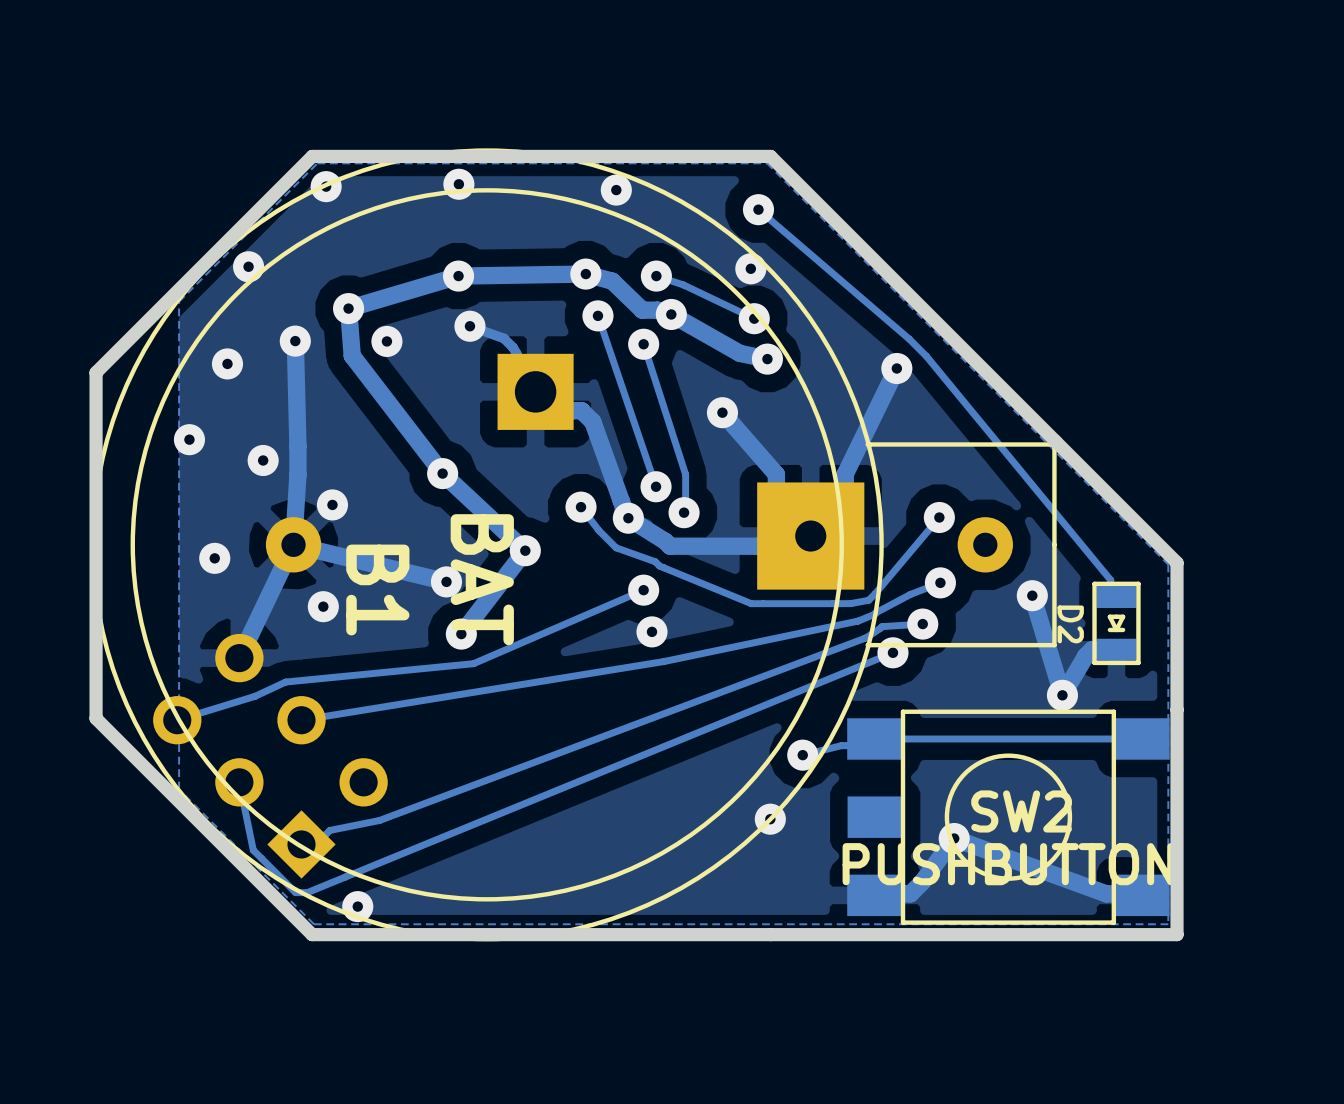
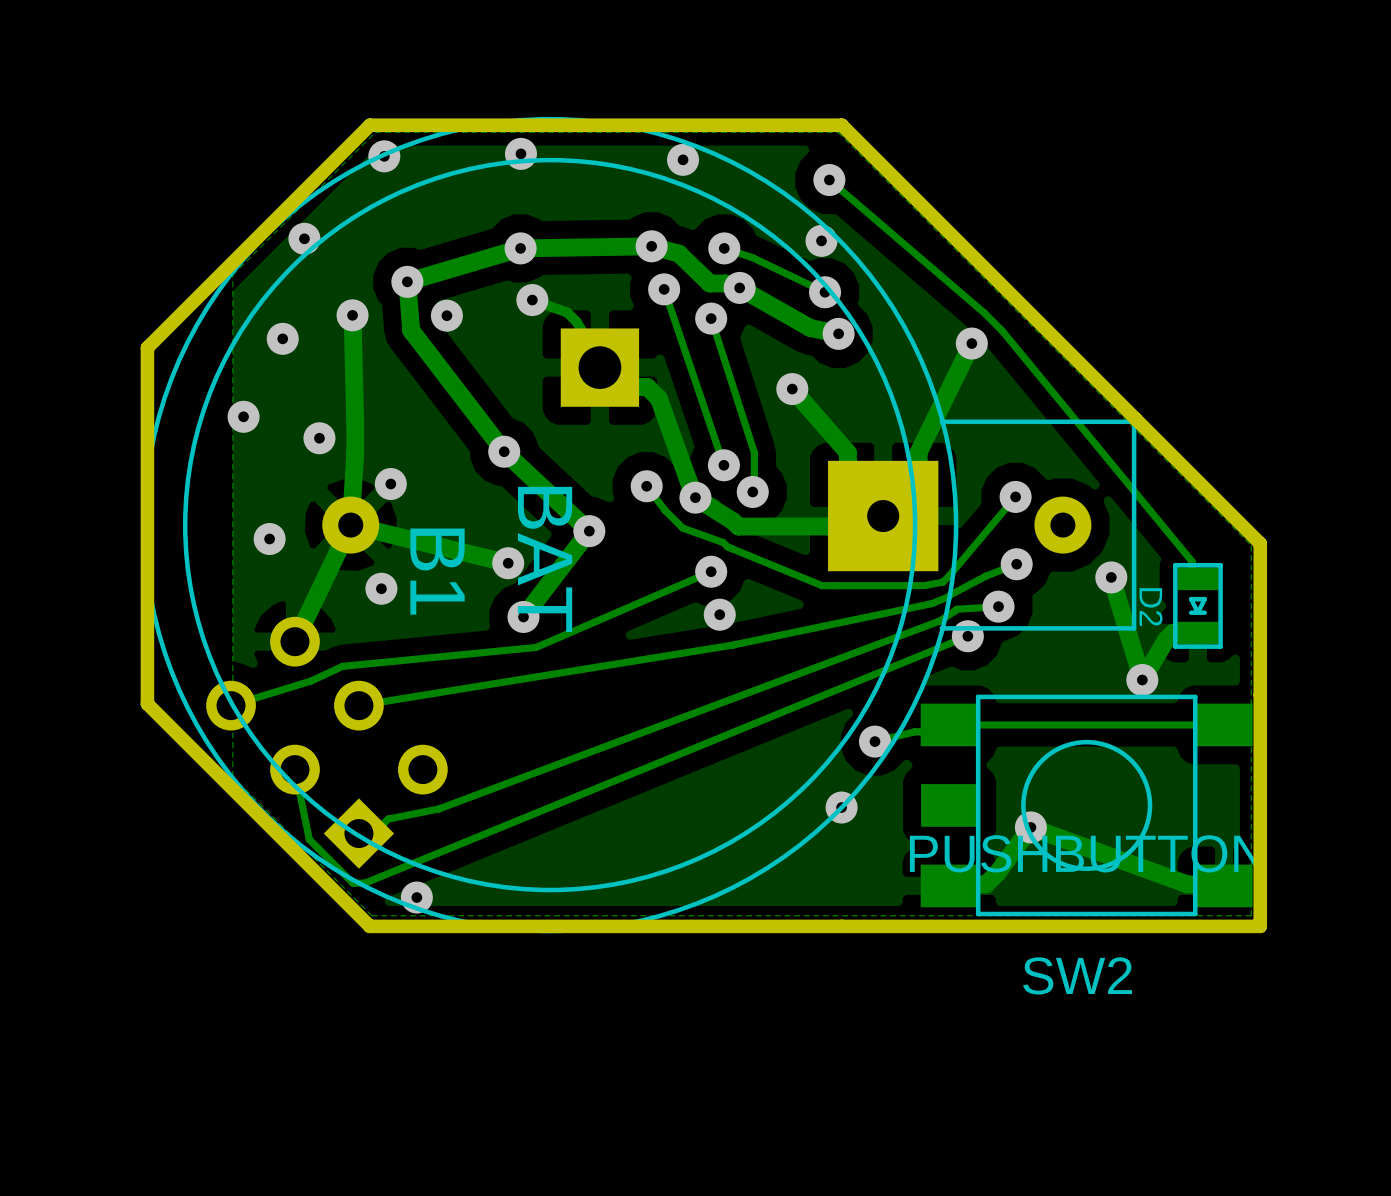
SW2 name position: SW2 (1021, 811) -> SW2 (1077, 975)

